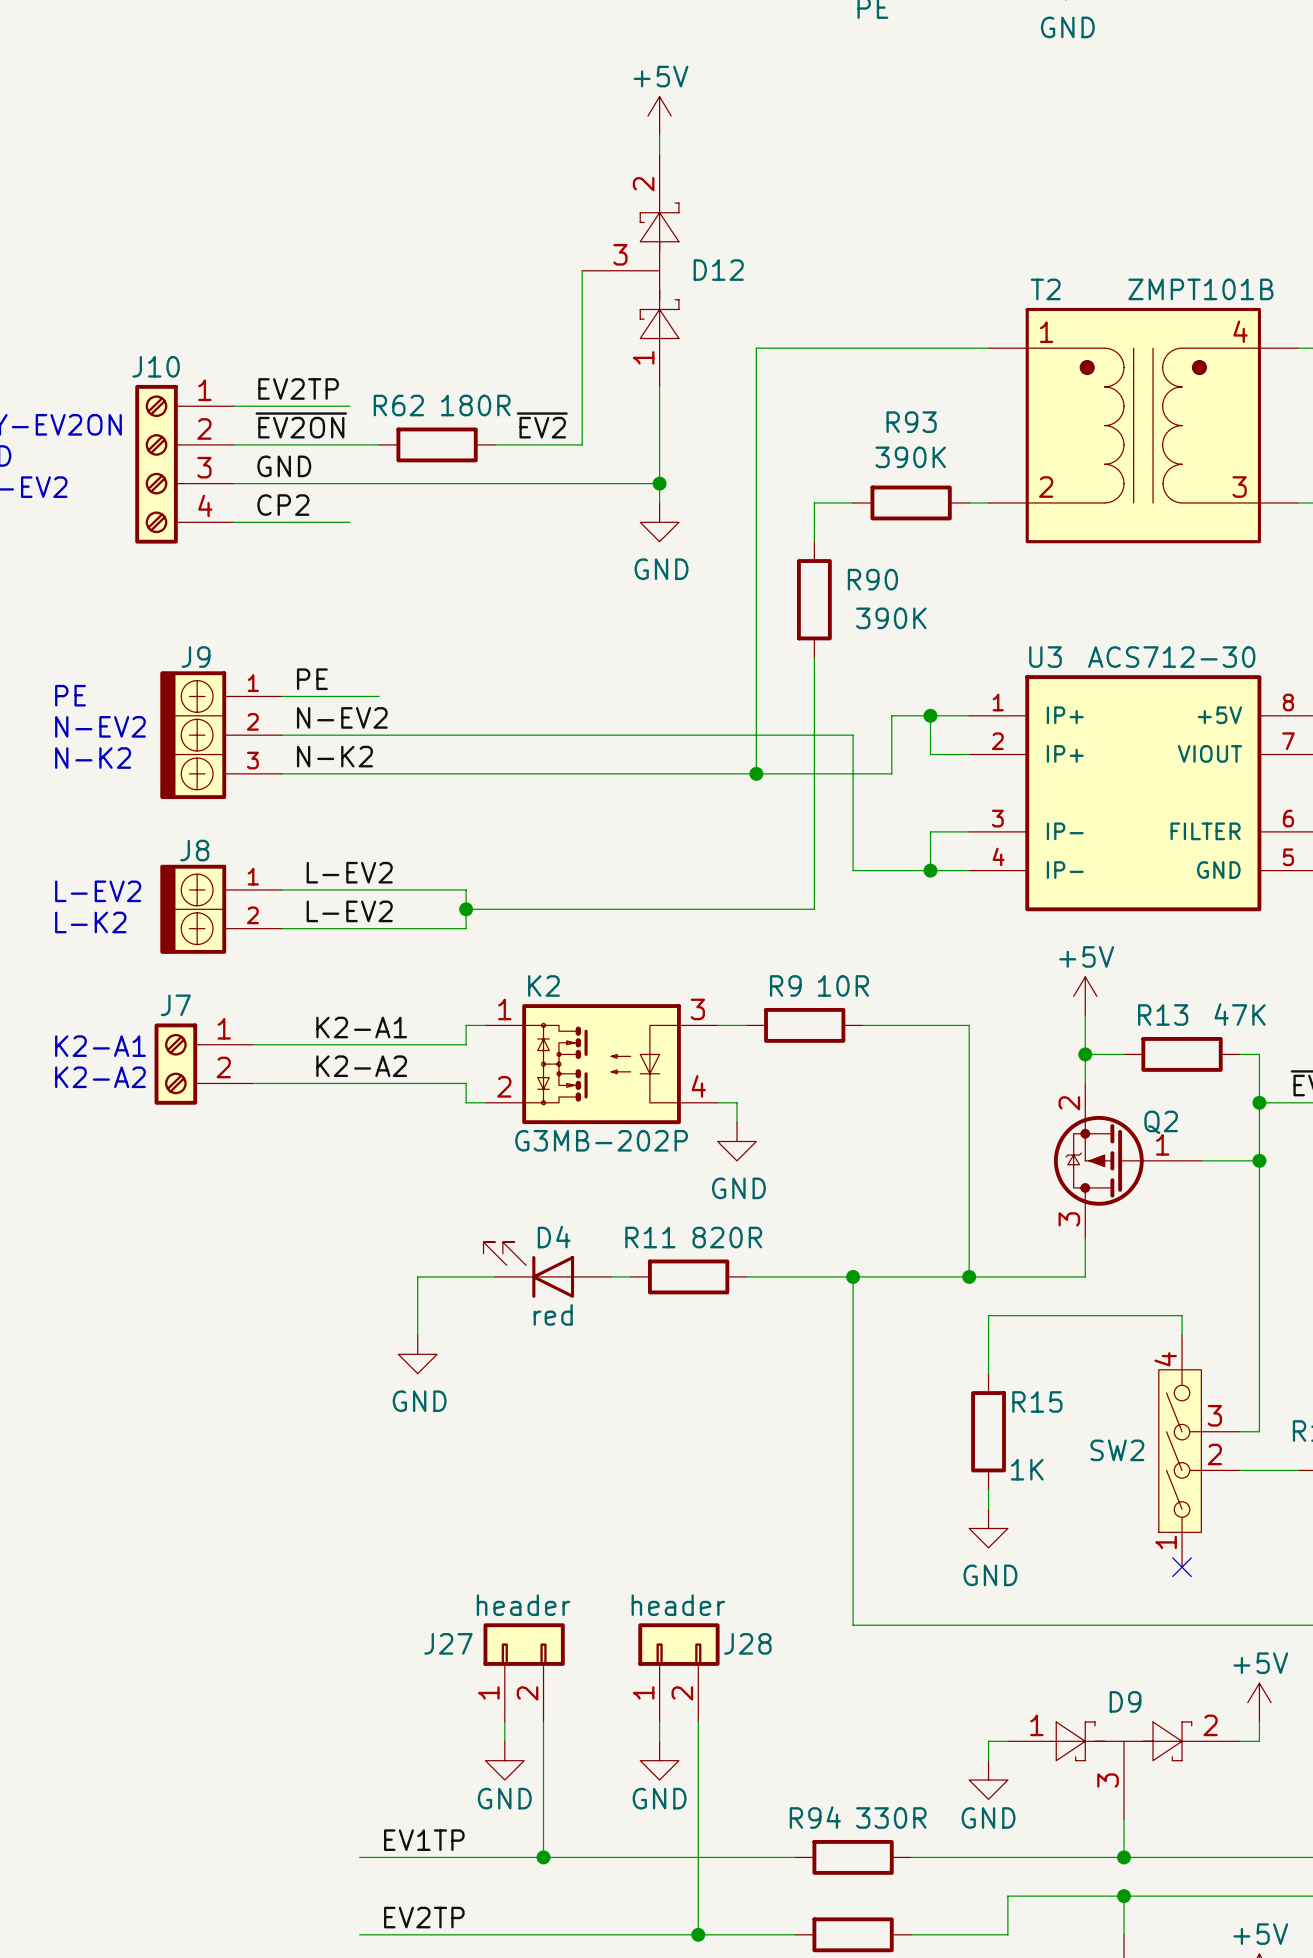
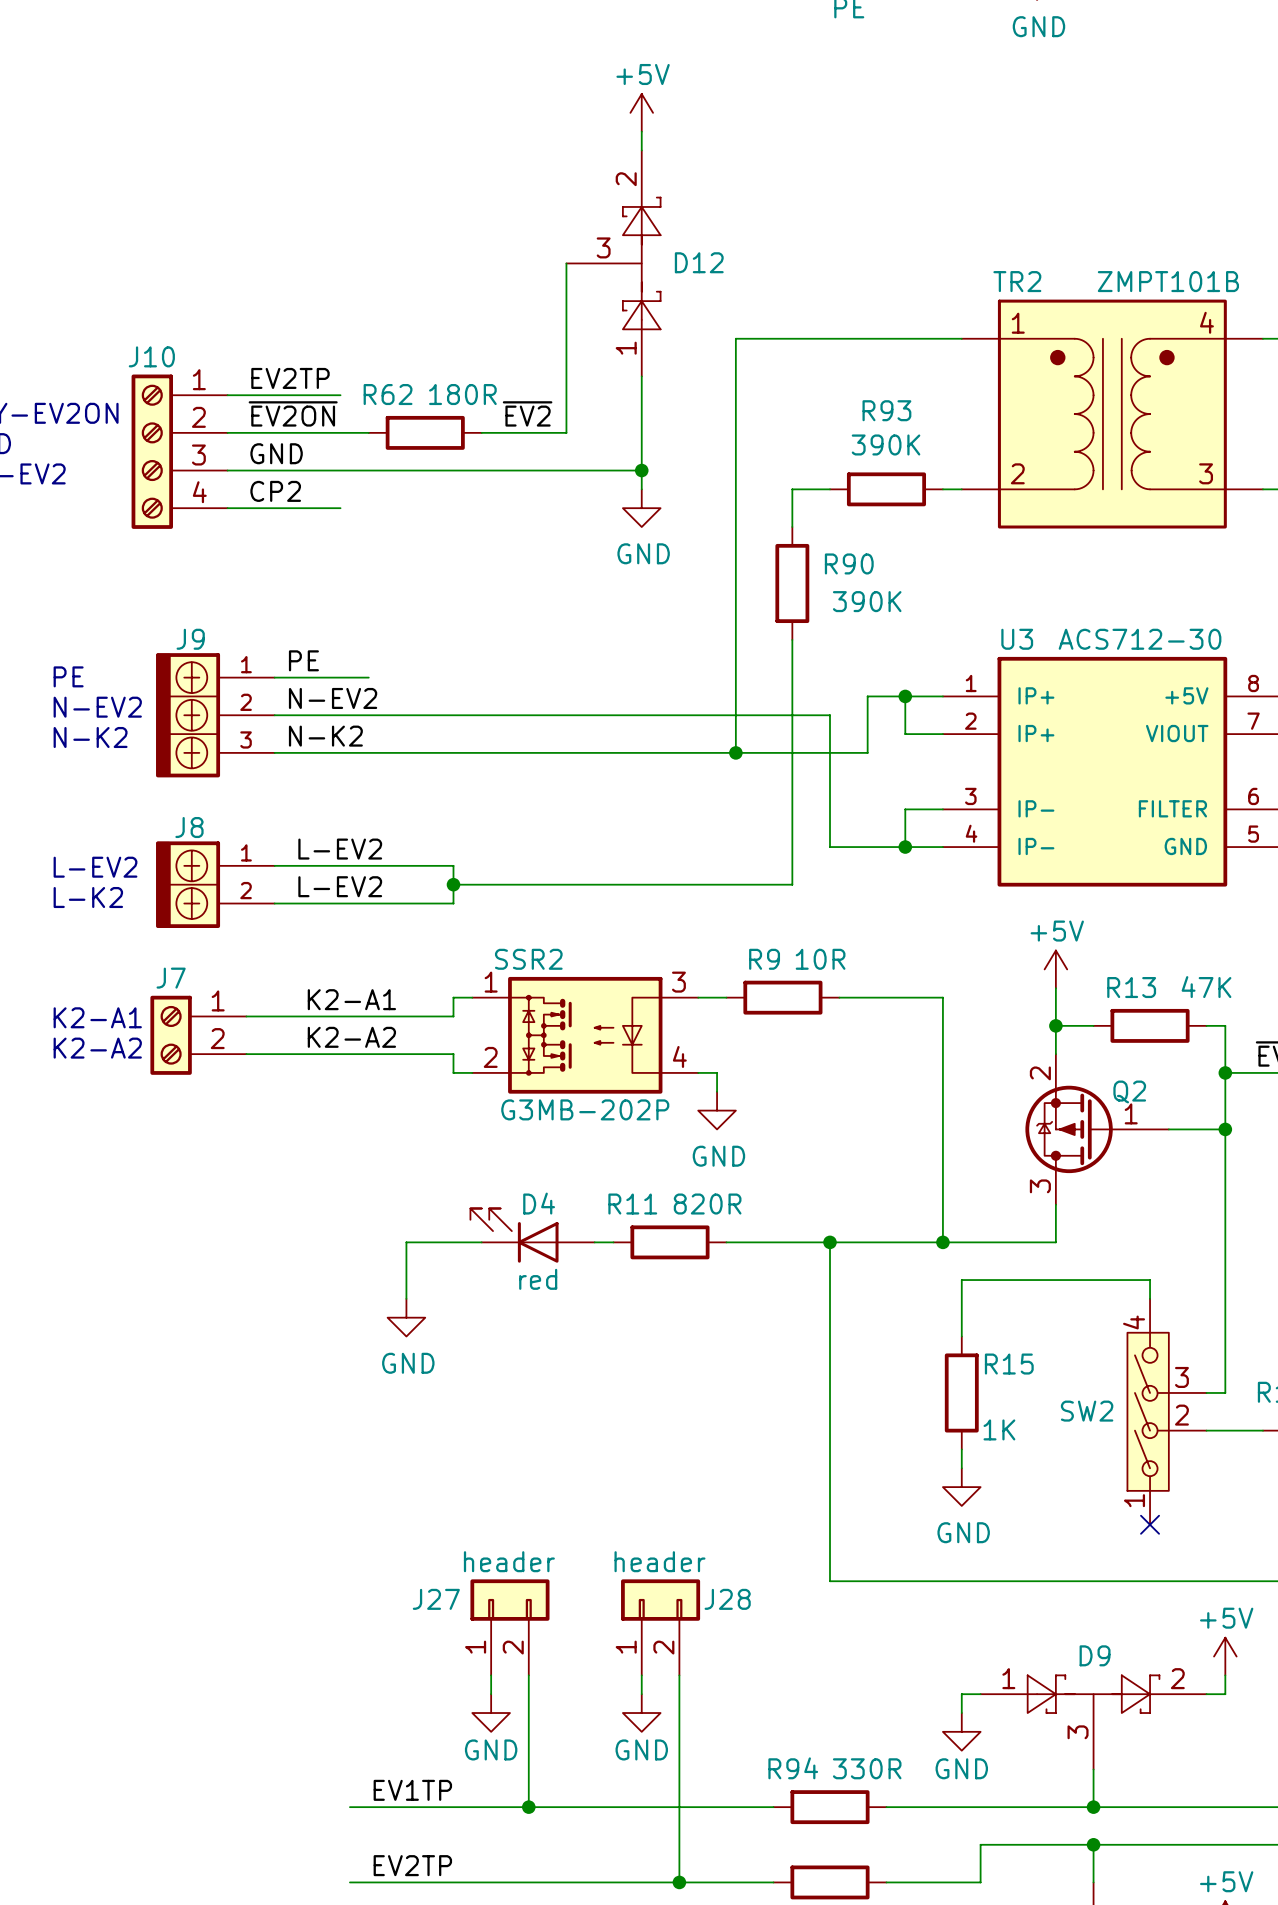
T2 name: T2 (1045, 289) -> TR2 (1017, 281)
K2 name: K2 (543, 985) -> SSR2 (528, 959)

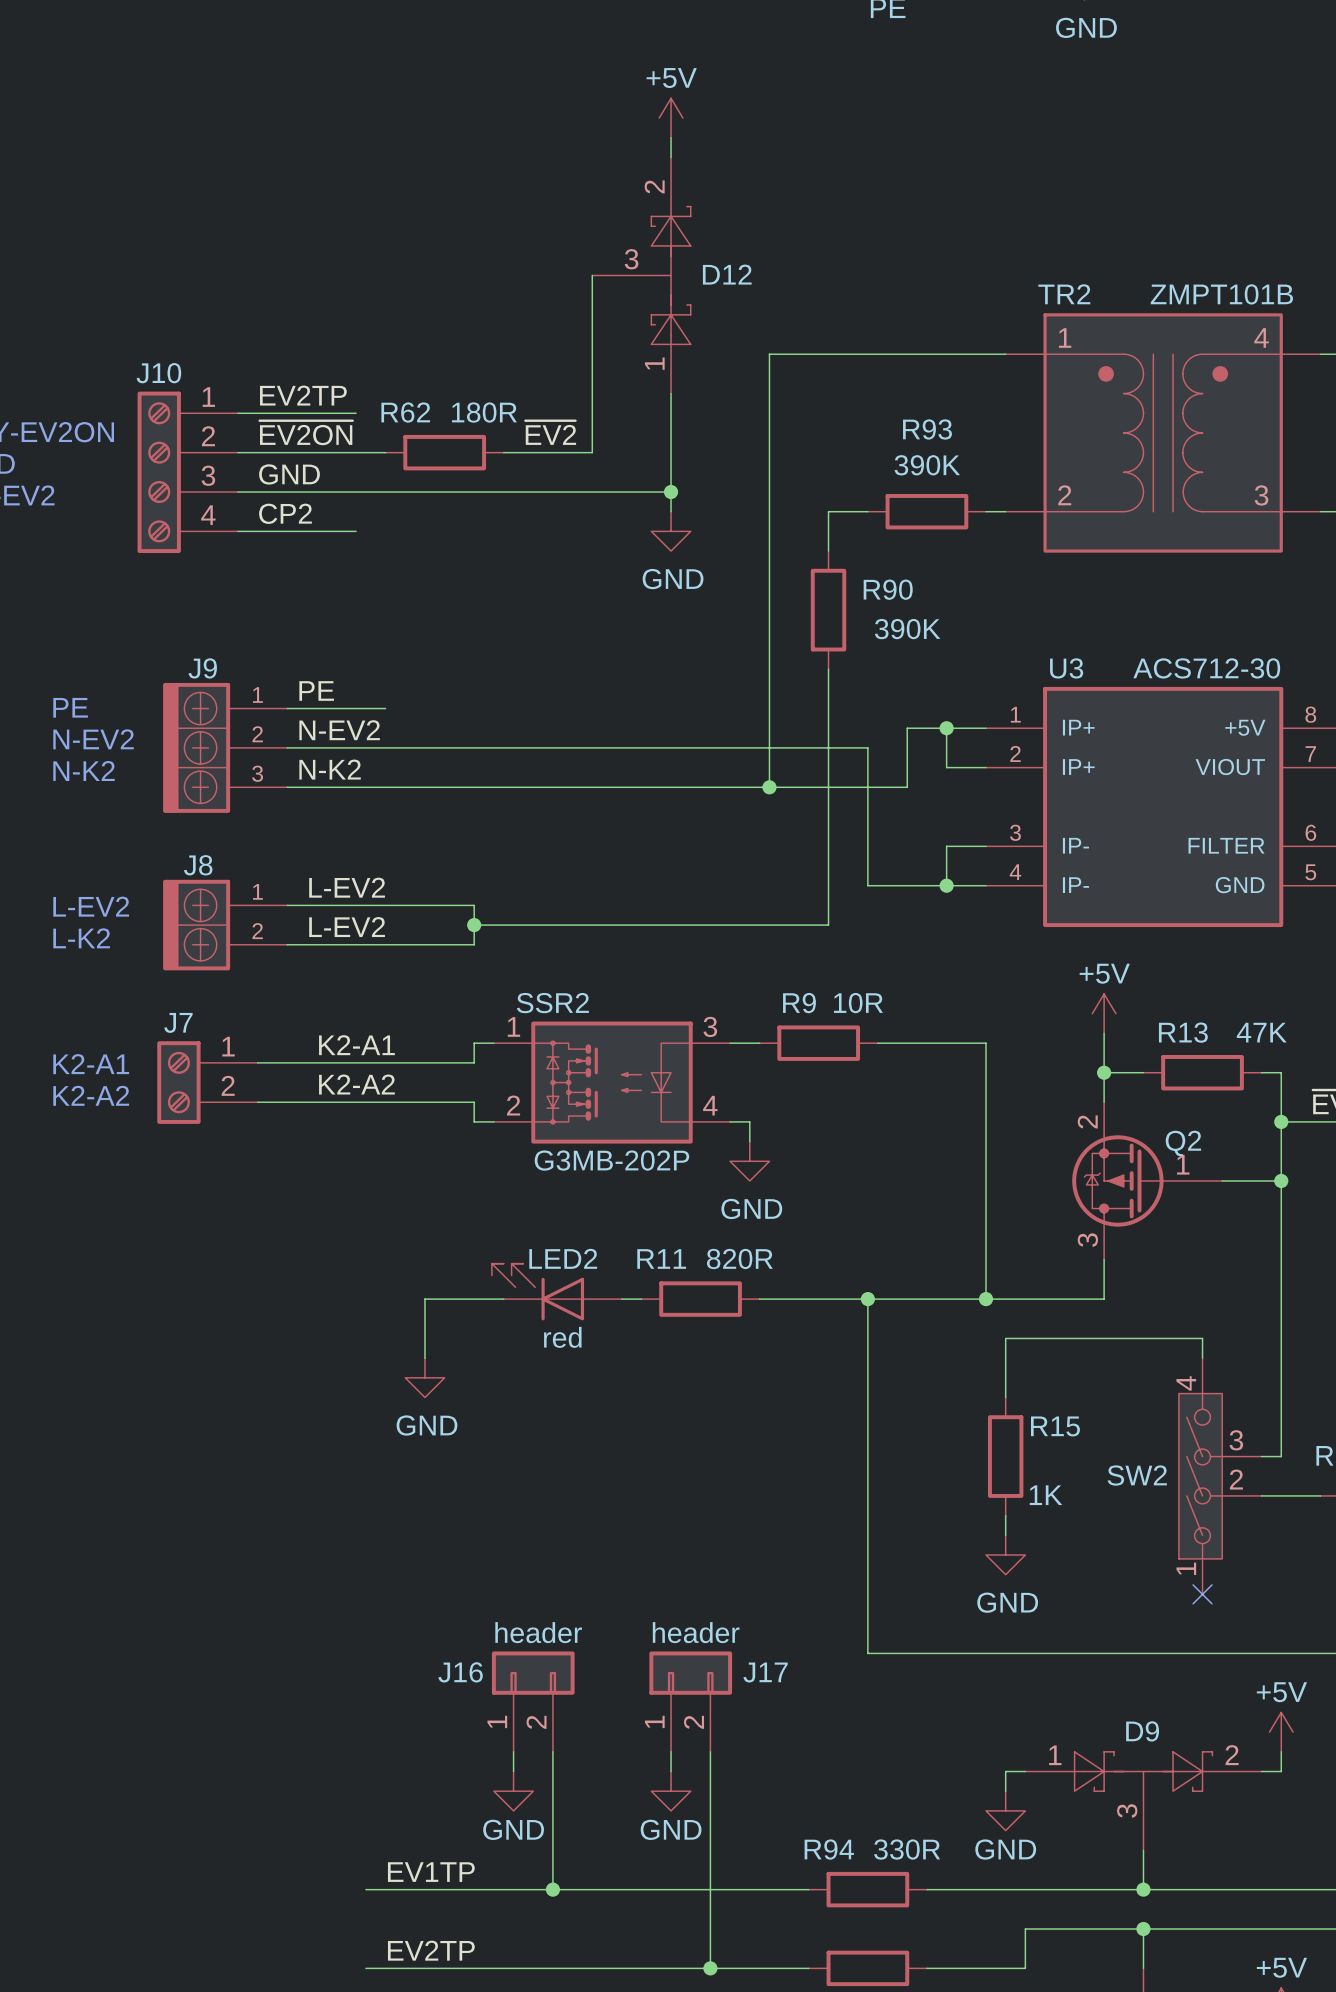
D4 name: D4 (539, 1203) -> LED2 (563, 1258)
J27 name: J27 (436, 1599) -> J16 (460, 1672)
J28 name: J28 (727, 1599) -> J17 (765, 1672)

